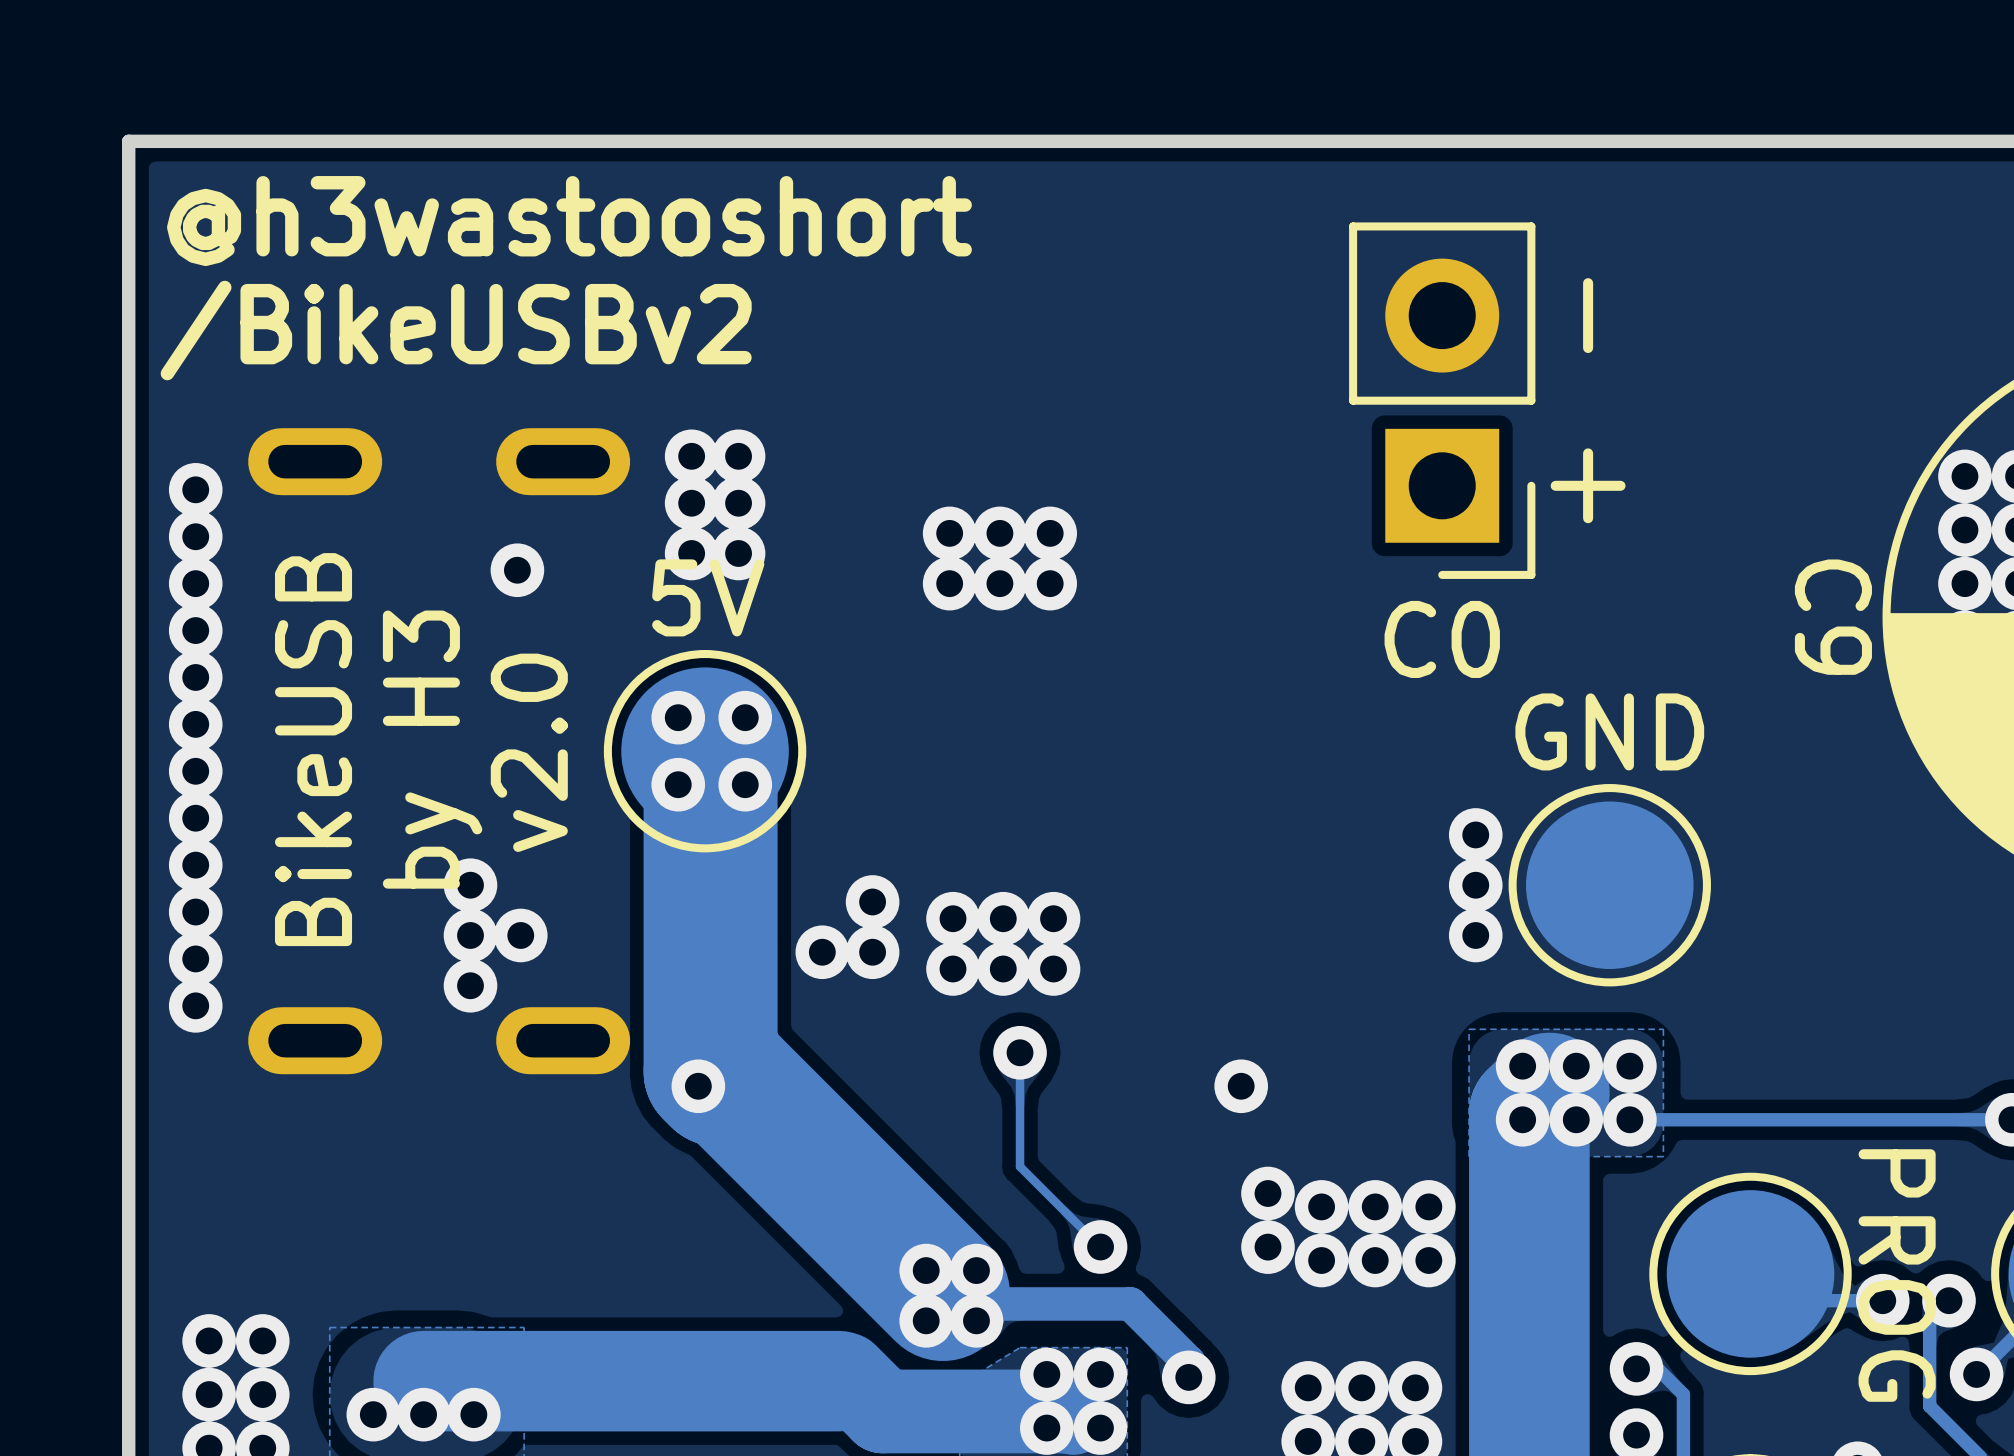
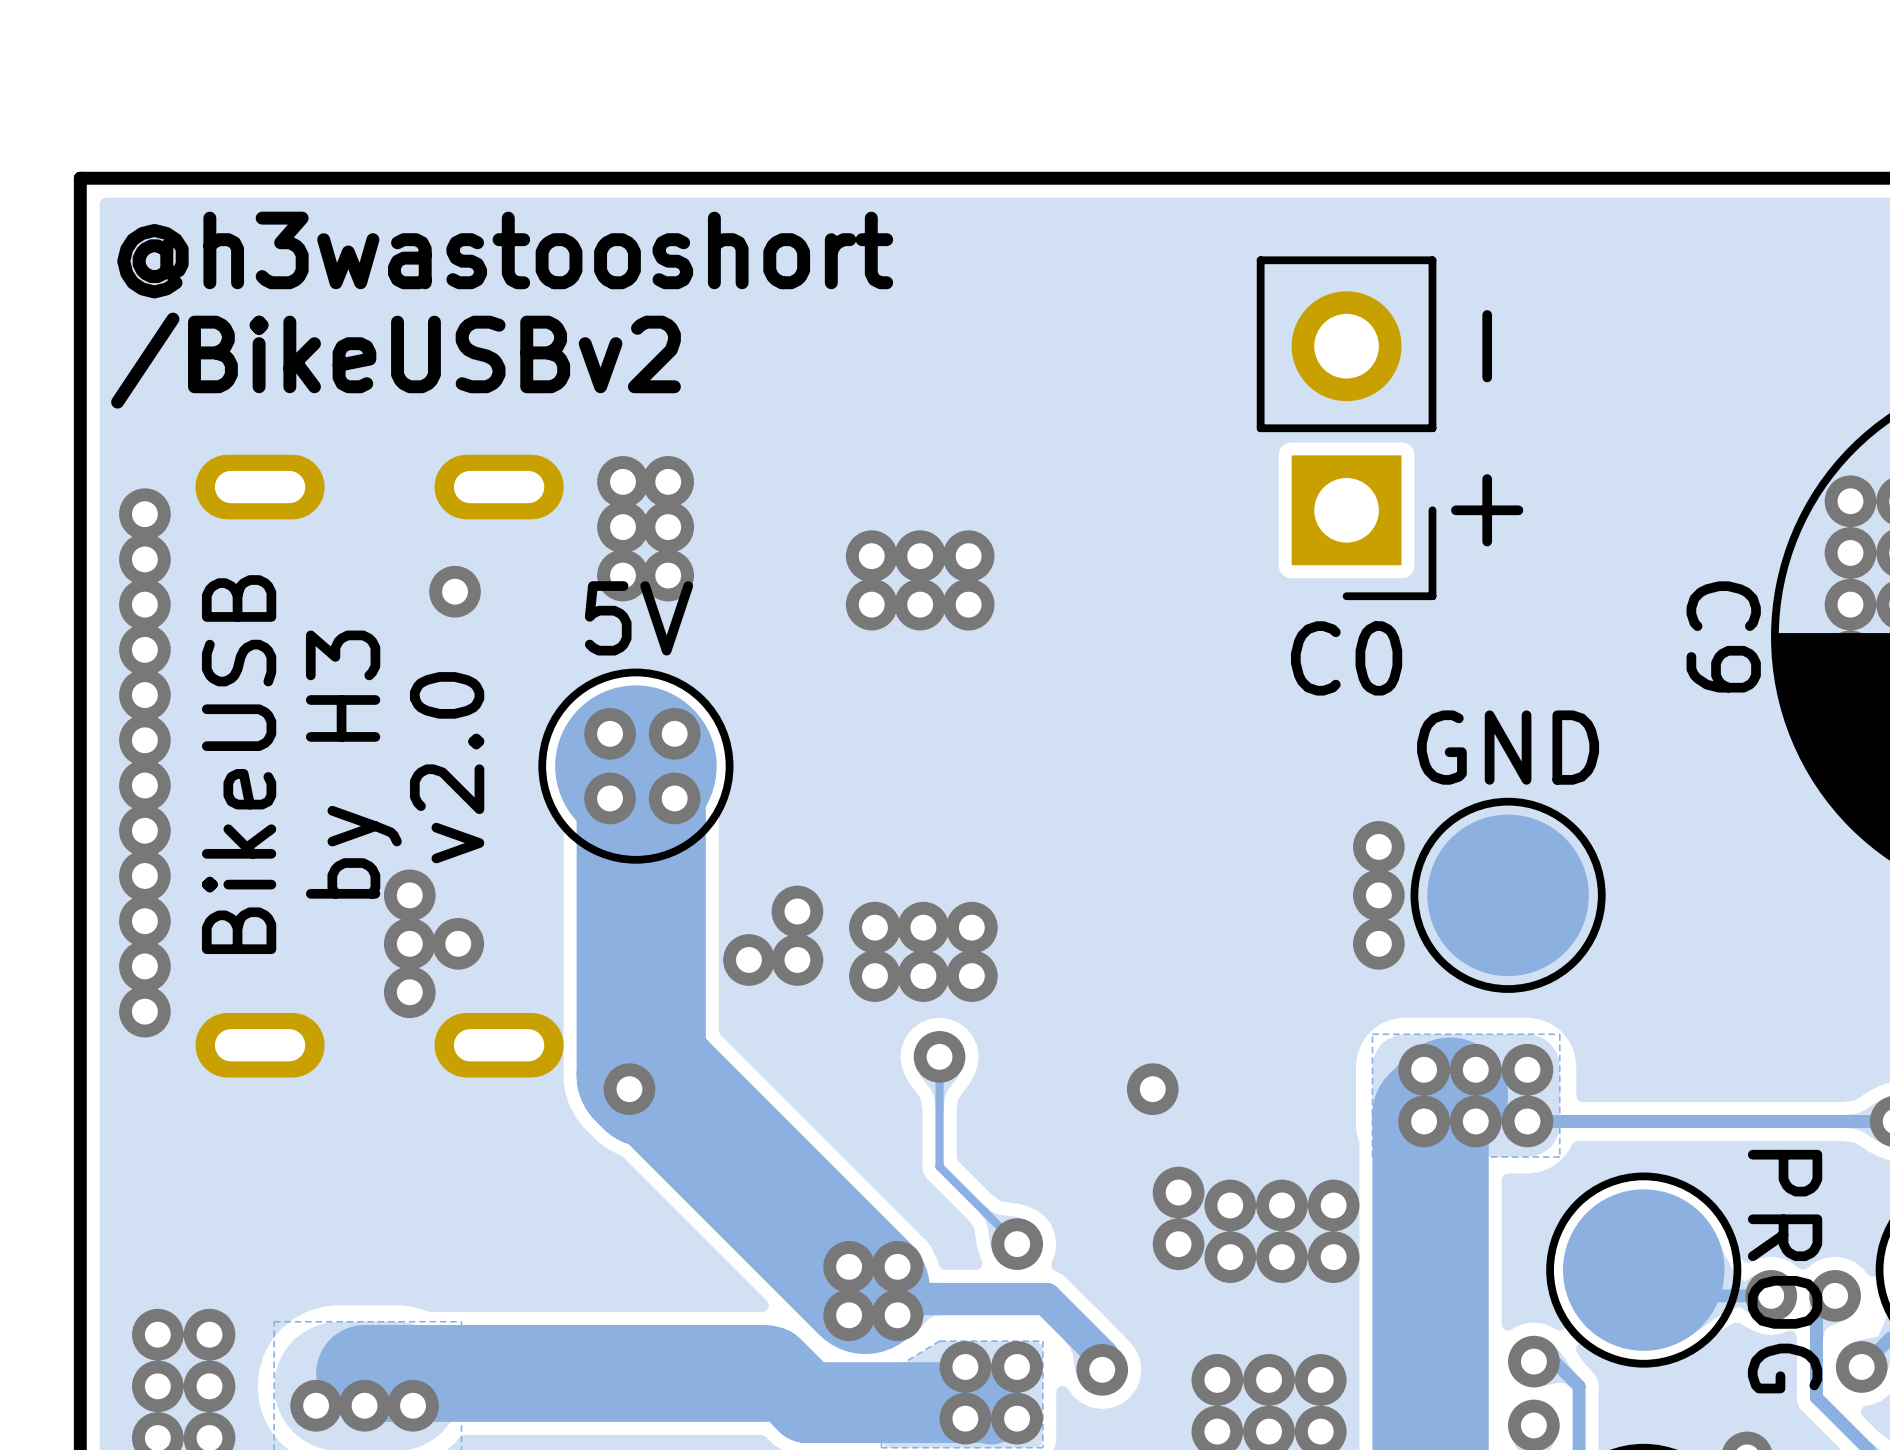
text position: BikeUSB (313, 749) -> BikeUSB (239, 764)
text position: by H3 (432, 749) -> by H3 (353, 764)
text position: v2.0 (529, 752) -> v2.0 (447, 767)

